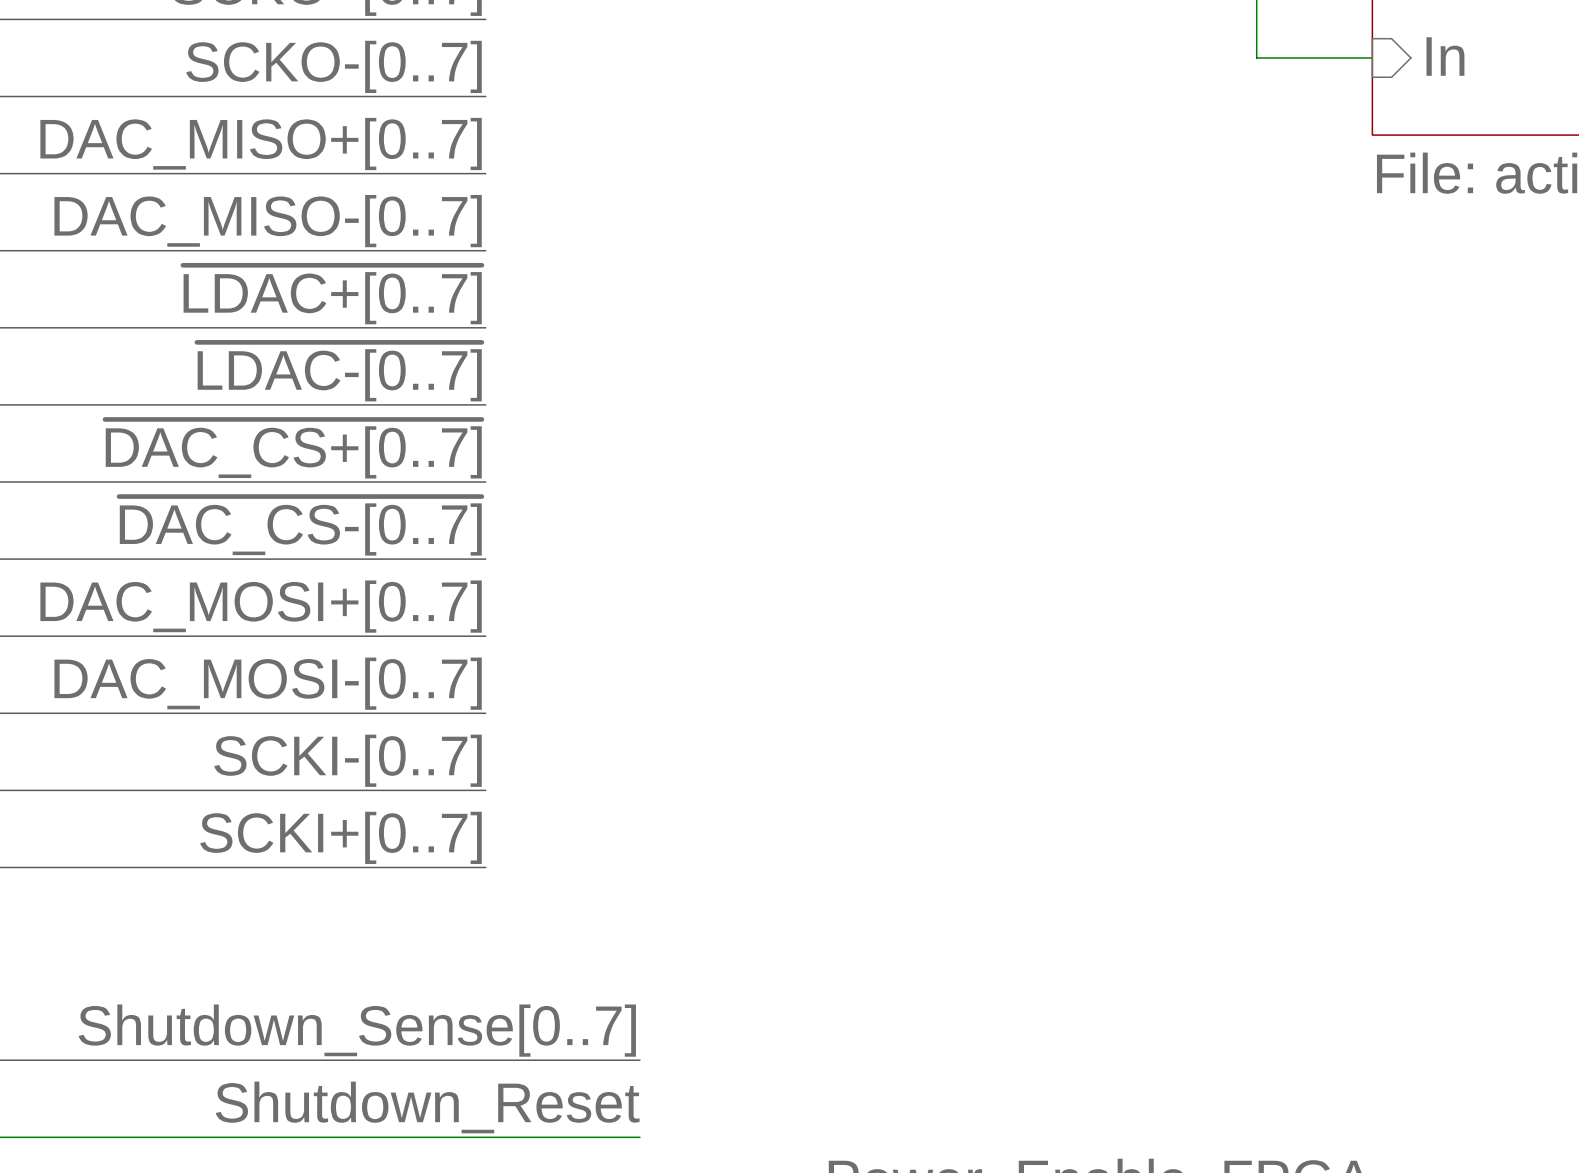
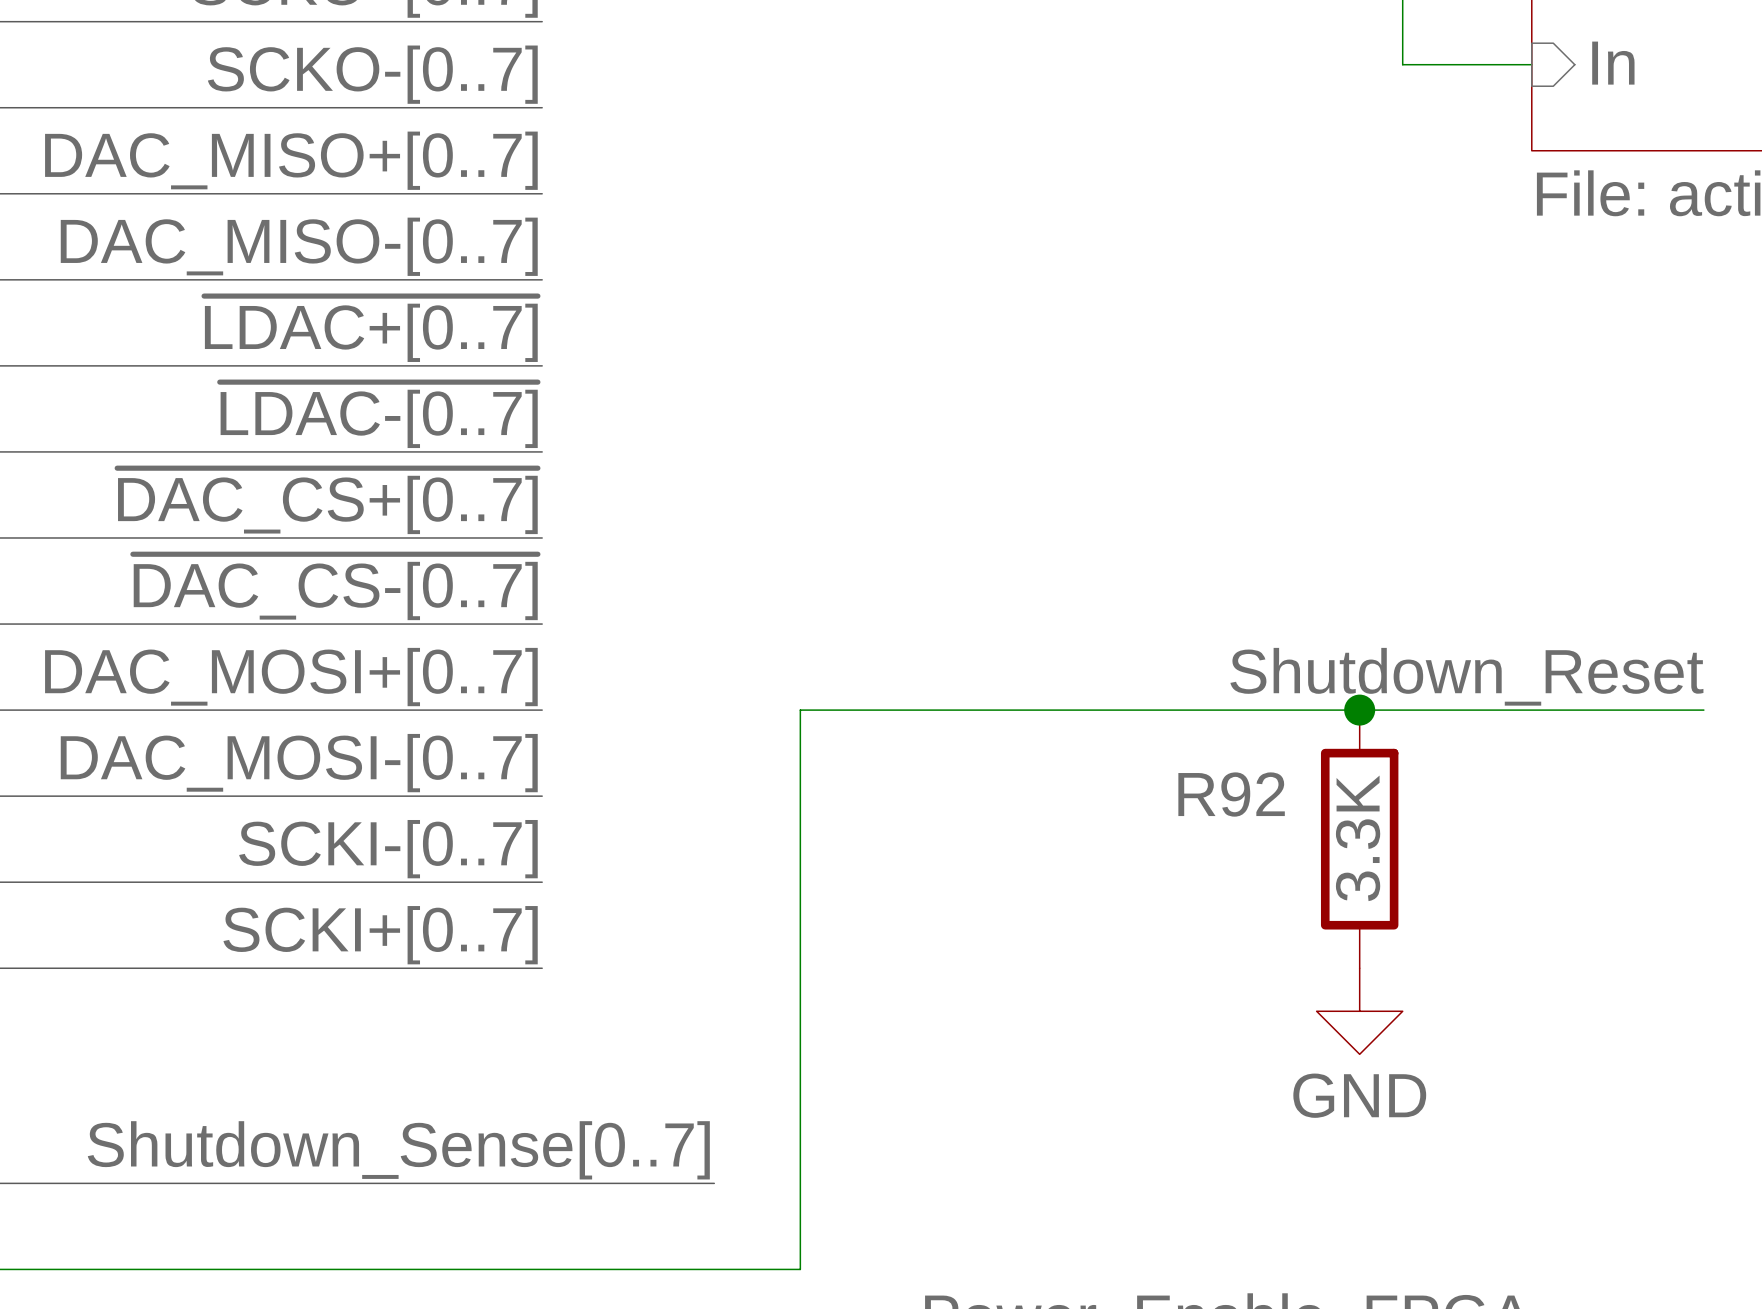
label: none -> Shutdown_Reset (1466, 676)
junction: none -> (1359, 710)
wire: none -> (1703, 710) (800, 710) (800, 1269) (714, 1269)
R92: none -> 3.3K (1359, 839)
power symbol: none -> GND (1359, 1011)
label: Shutdown_Reset (427, 1107) -> none

